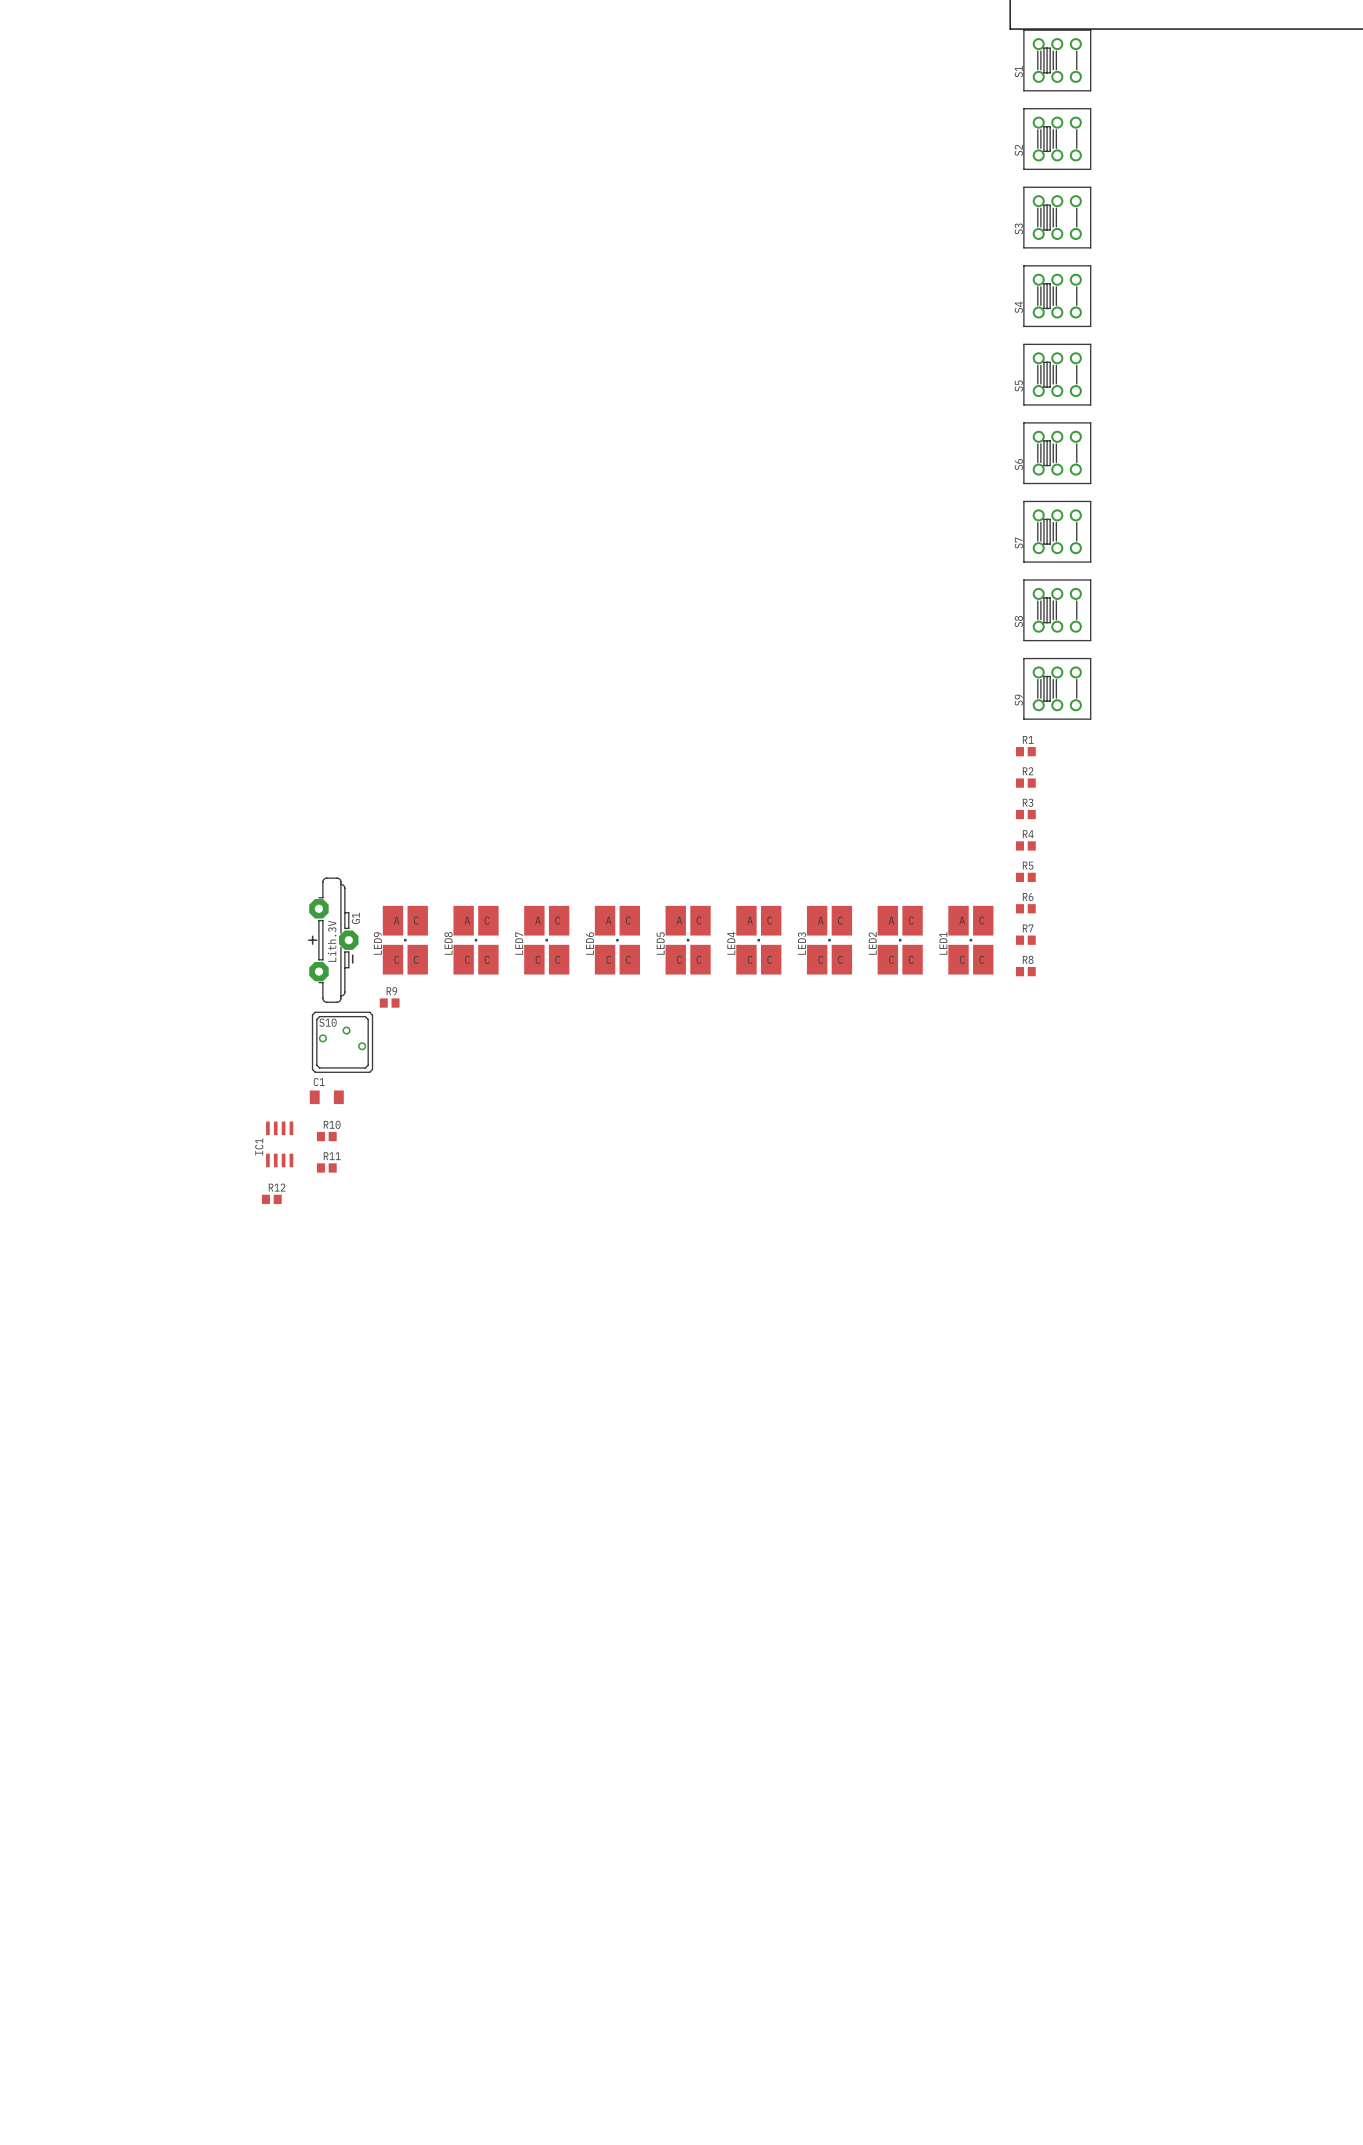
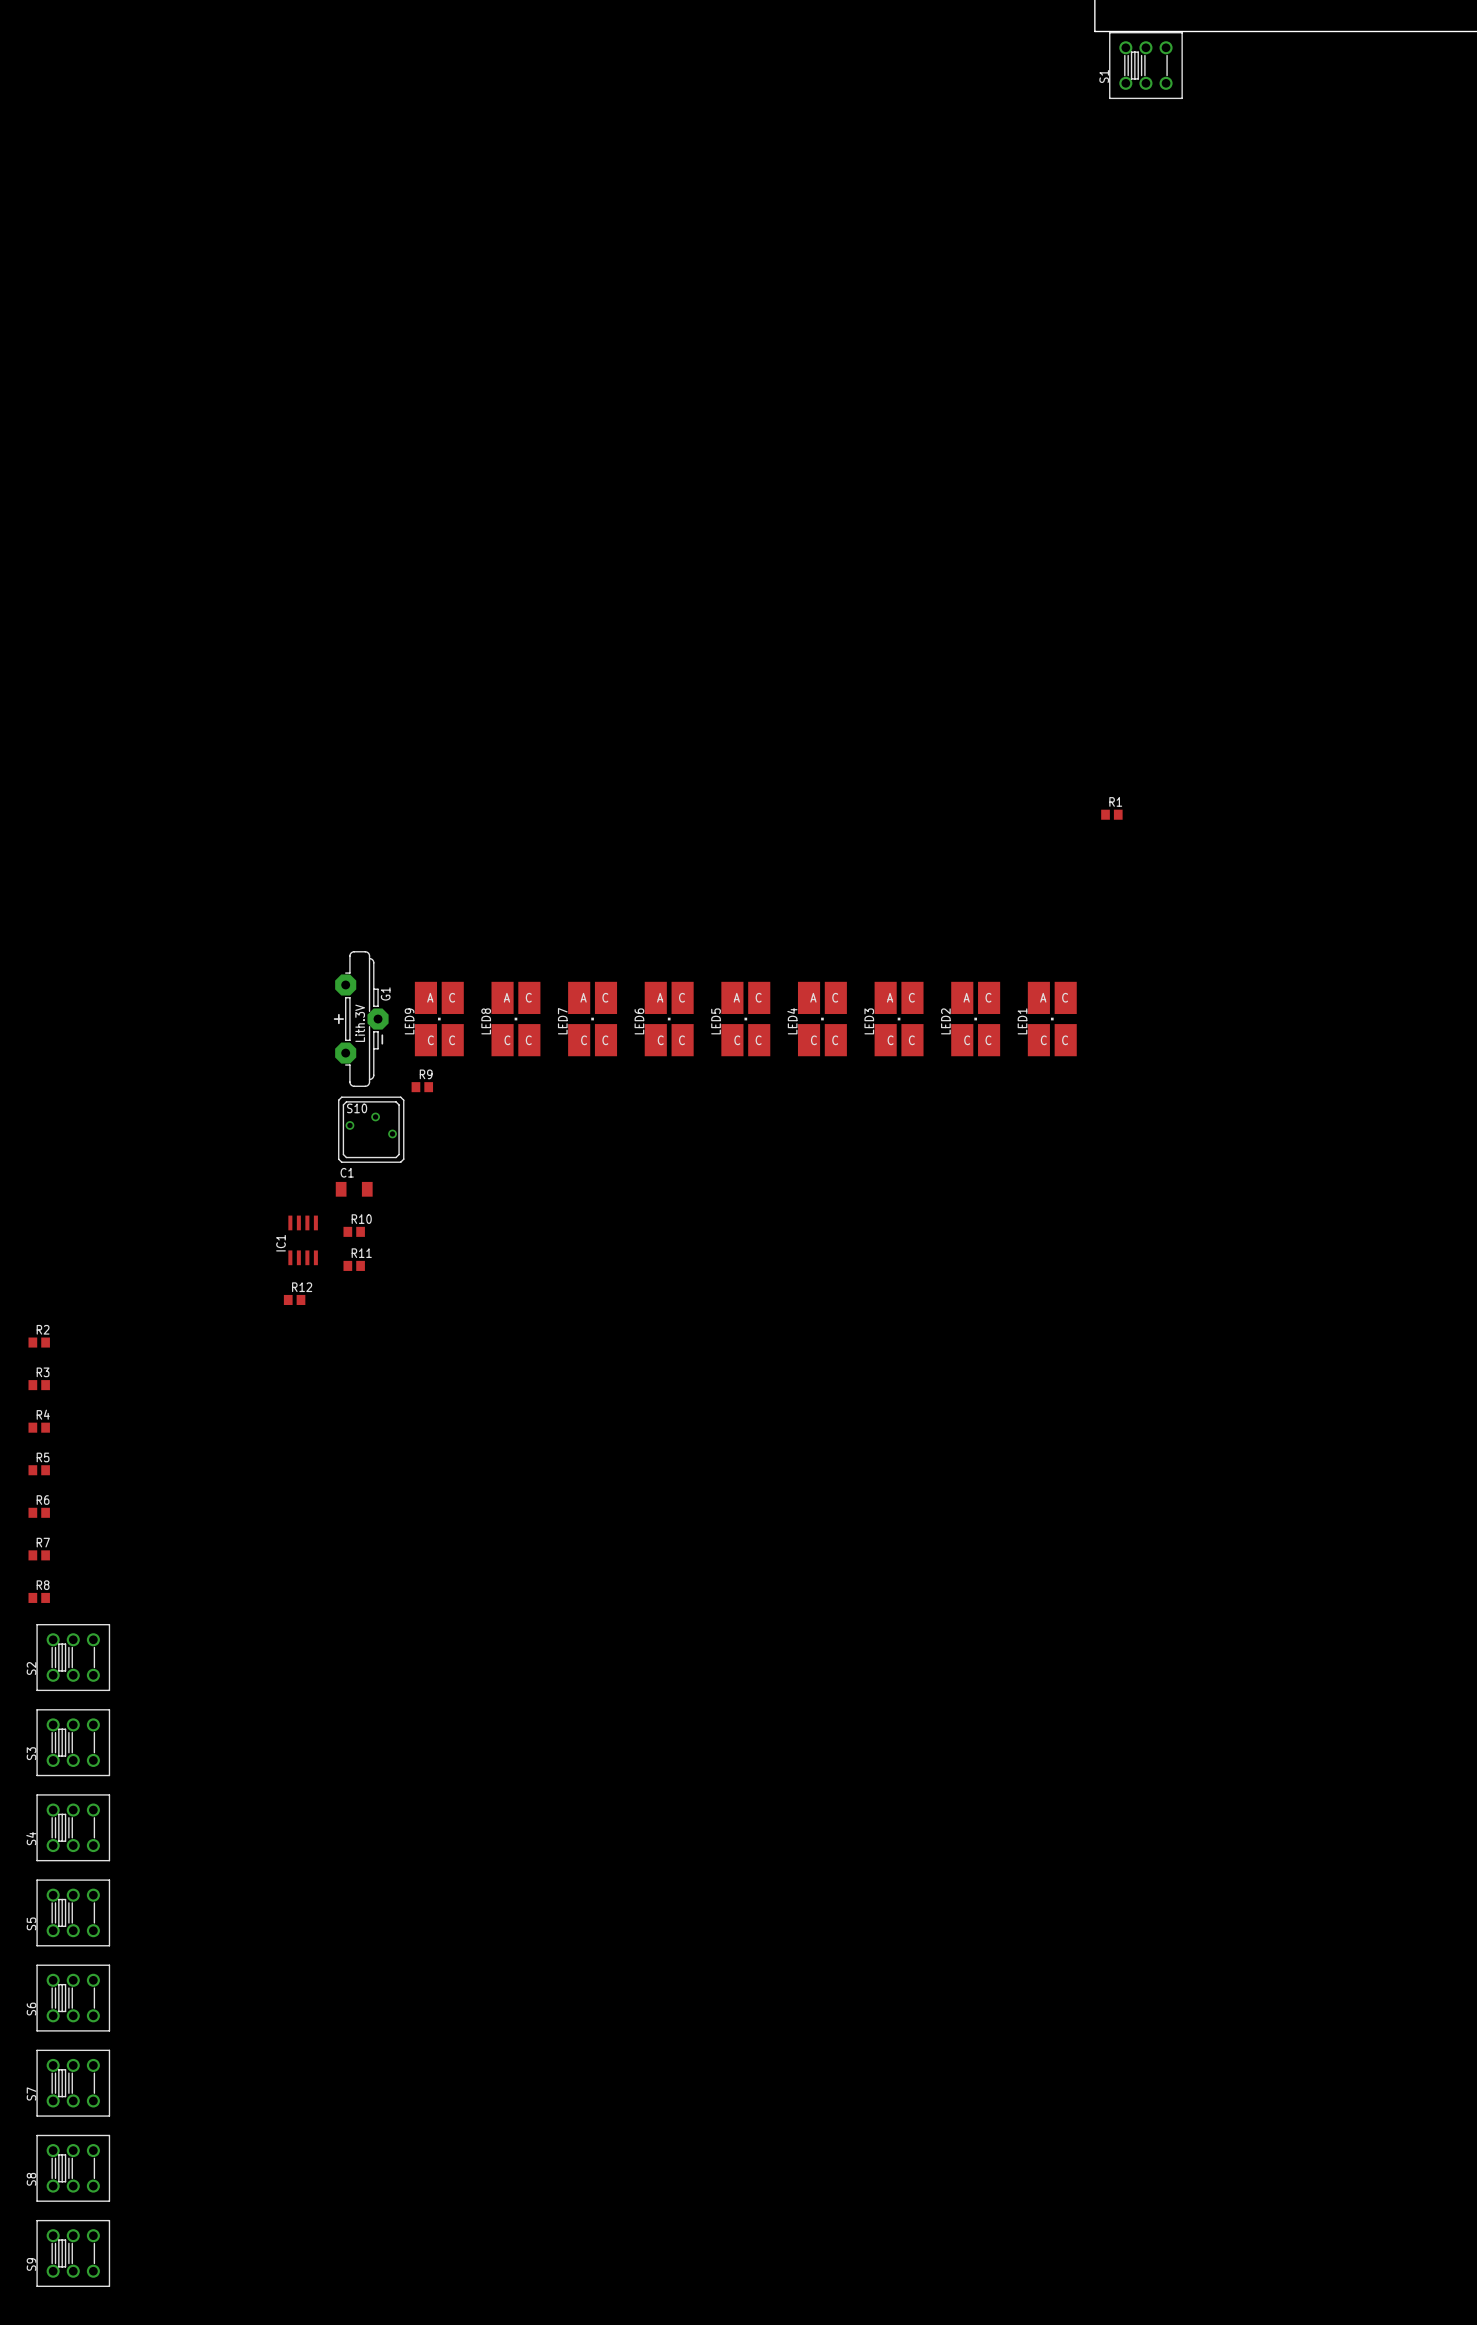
S2 position: (1057, 139) -> (73, 1657)
S3 position: (1057, 217) -> (73, 1742)
S4 position: (1057, 296) -> (73, 1827)
S5 position: (1057, 374) -> (73, 1912)
S6 position: (1057, 453) -> (73, 1998)
S7 position: (1057, 531) -> (73, 2083)
S8 position: (1057, 610) -> (73, 2168)
S9 position: (1057, 688) -> (73, 2253)
R2 position: (1025, 783) -> (39, 1342)
R3 position: (1025, 814) -> (39, 1385)
R4 position: (1025, 845) -> (39, 1427)
R5 position: (1025, 877) -> (39, 1470)
R6 position: (1025, 908) -> (39, 1512)
R7 position: (1025, 940) -> (39, 1555)
R8 position: (1025, 971) -> (39, 1597)

